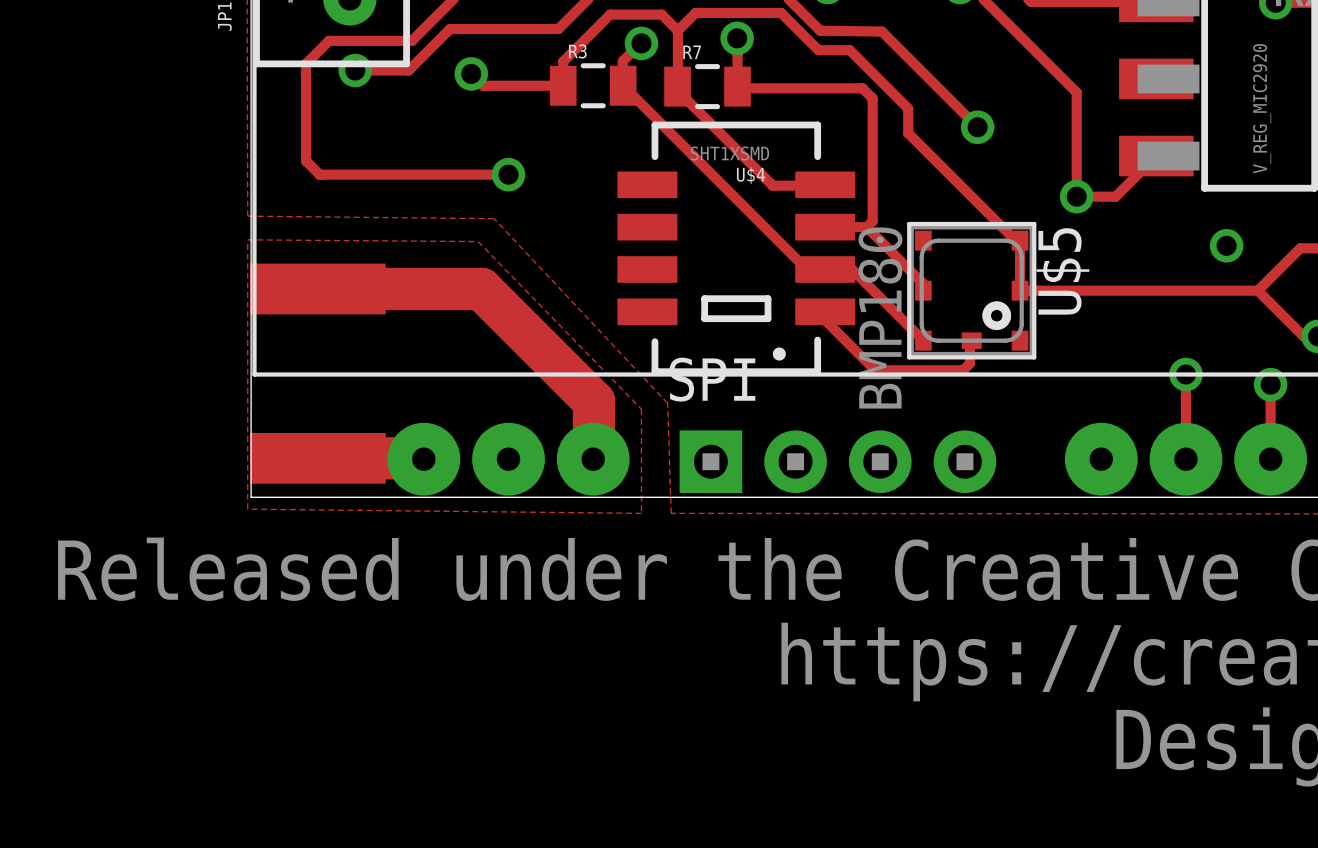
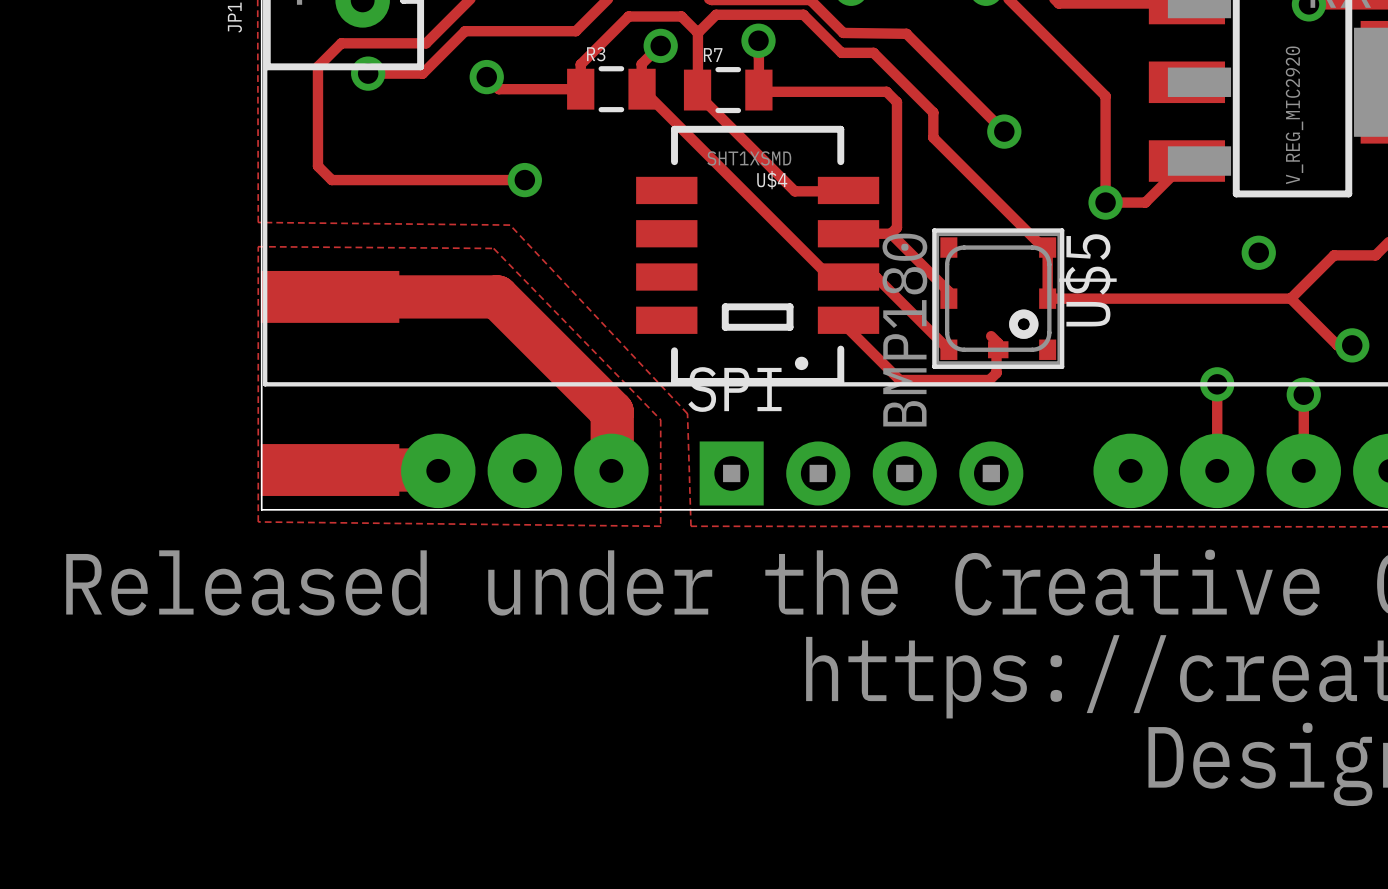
track: none -> (991, 336) (998, 343) (998, 349)

